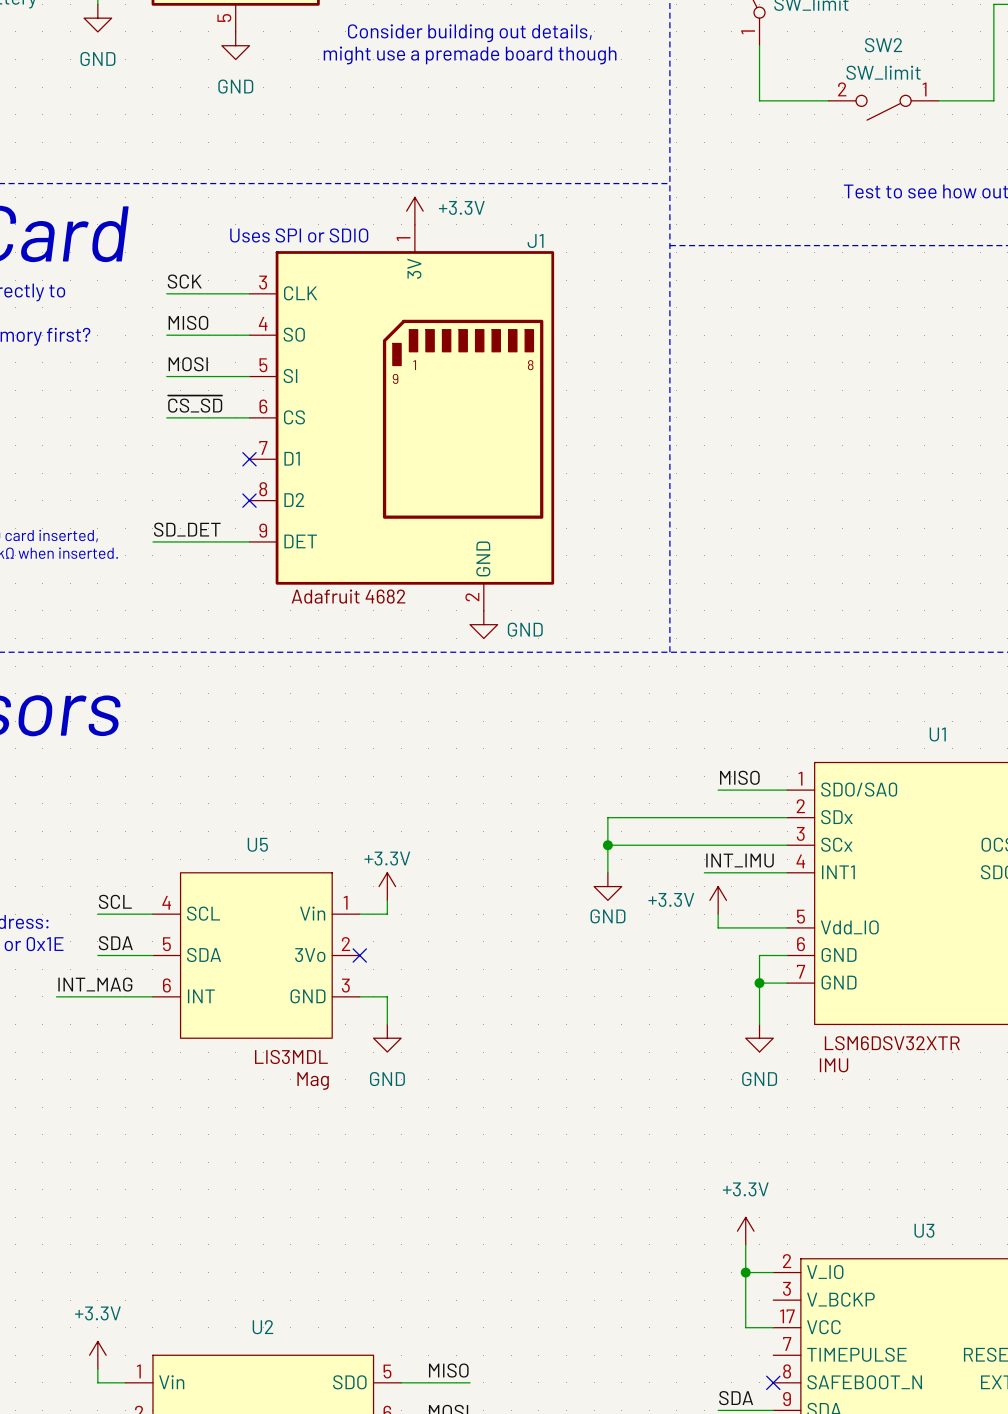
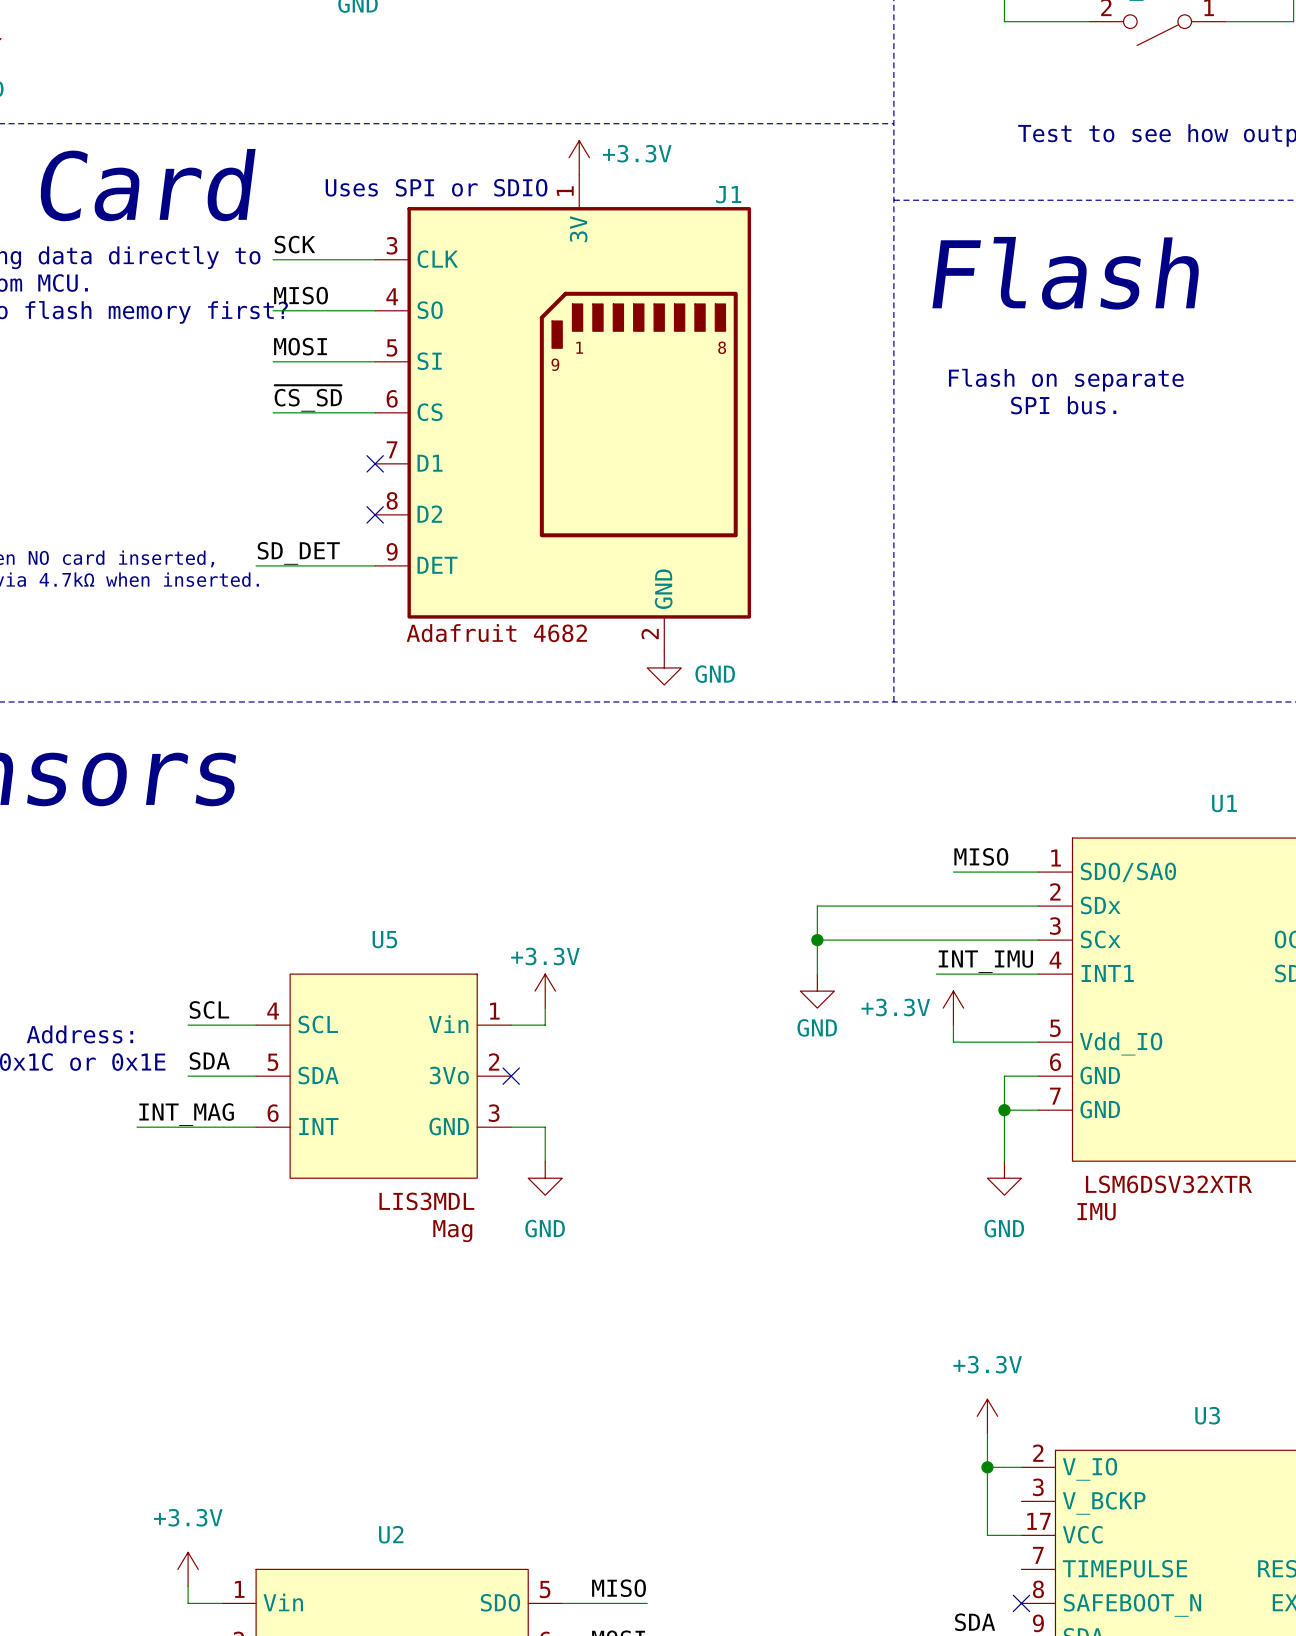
text: none -> Flash (1066, 273)
text: none -> Flash on separate (1066, 380)
text: none -> SPI bus. (1063, 405)

